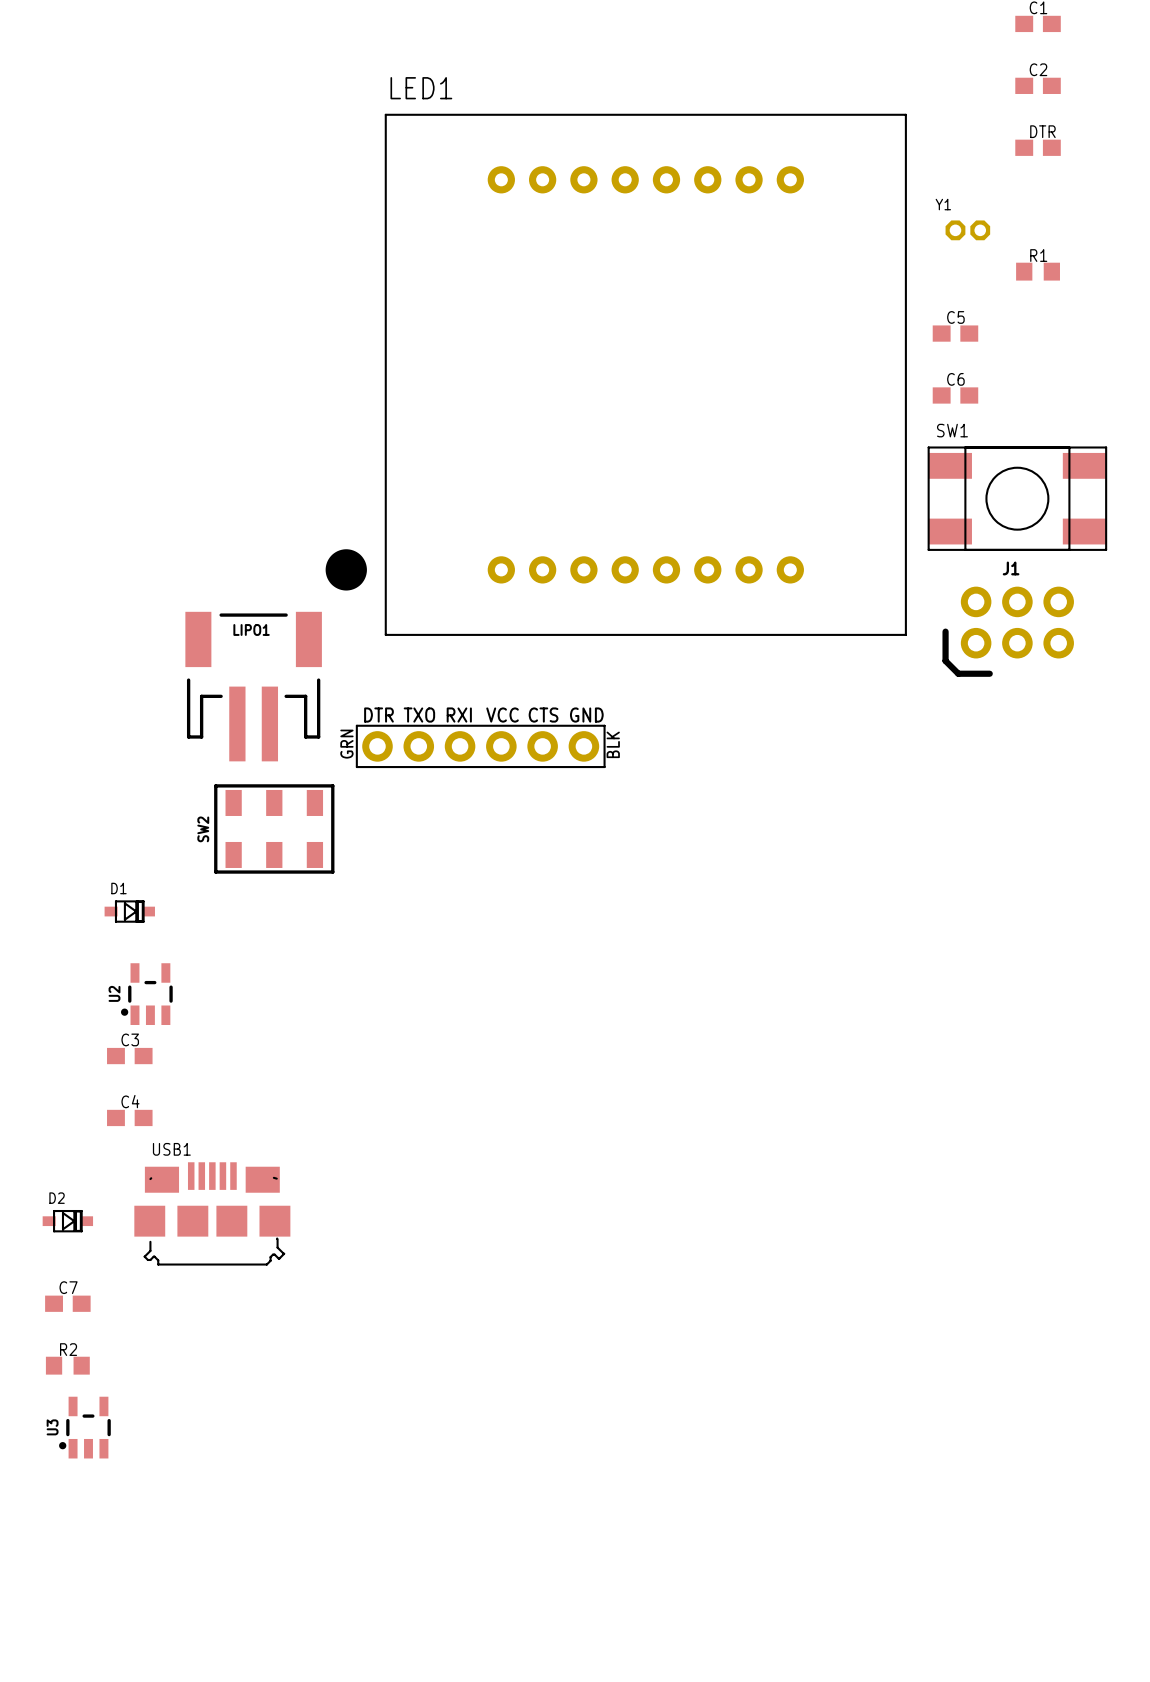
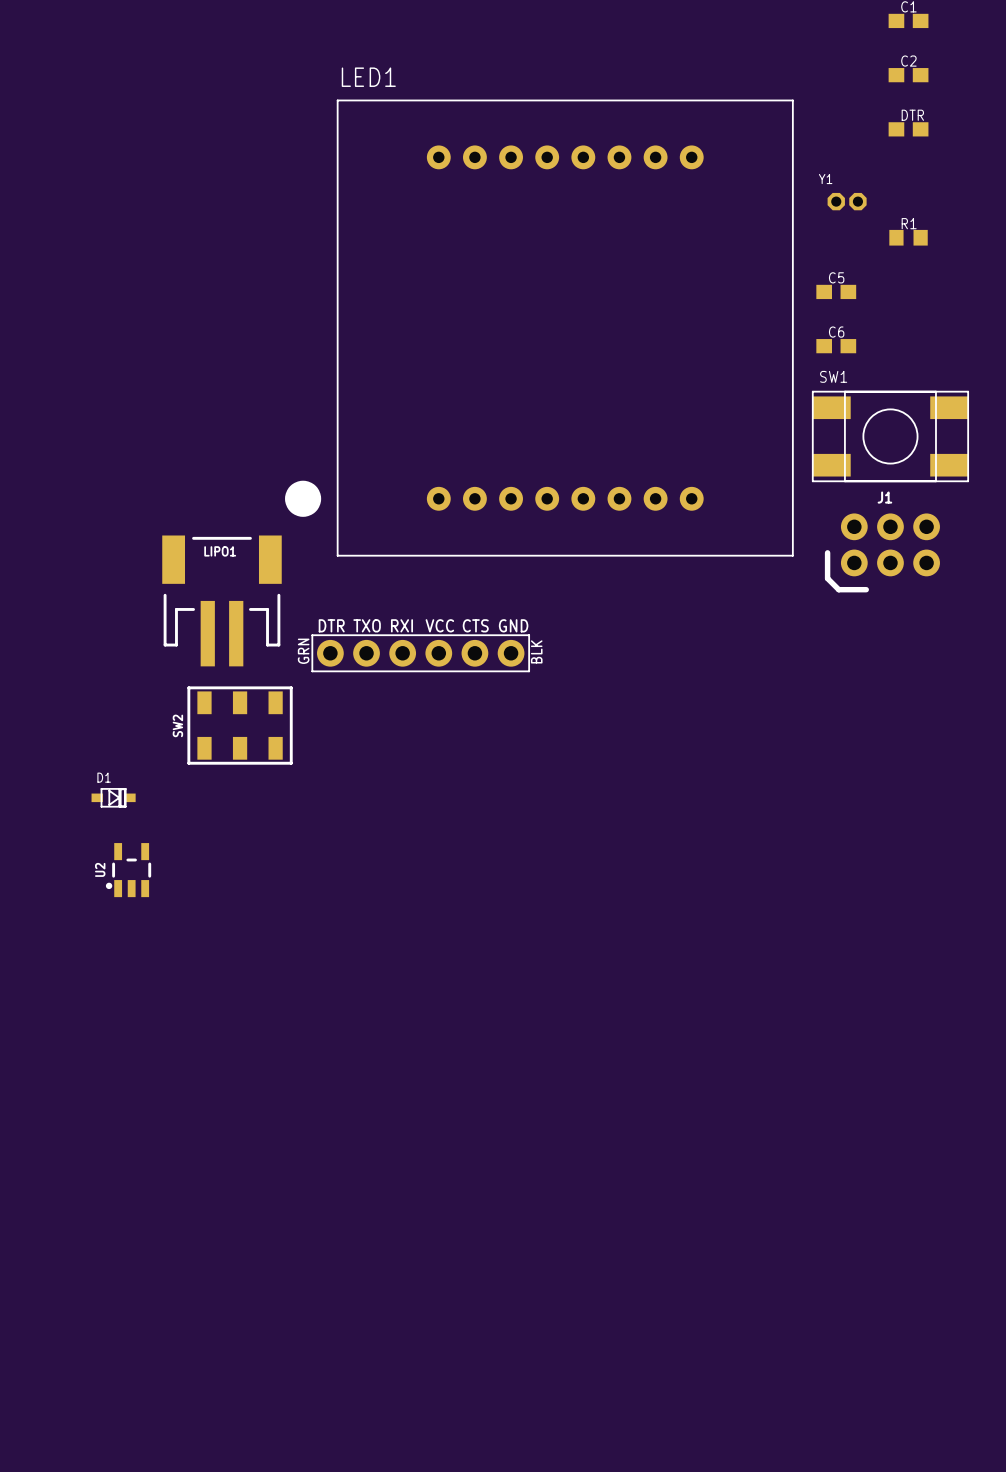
C3: (129, 1056) -> none
C4: (129, 1117) -> none
USB1: (212, 1213) -> none
D2: (67, 1221) -> none
C7: (67, 1303) -> none
R2: (67, 1365) -> none
U3: (84, 1427) -> none

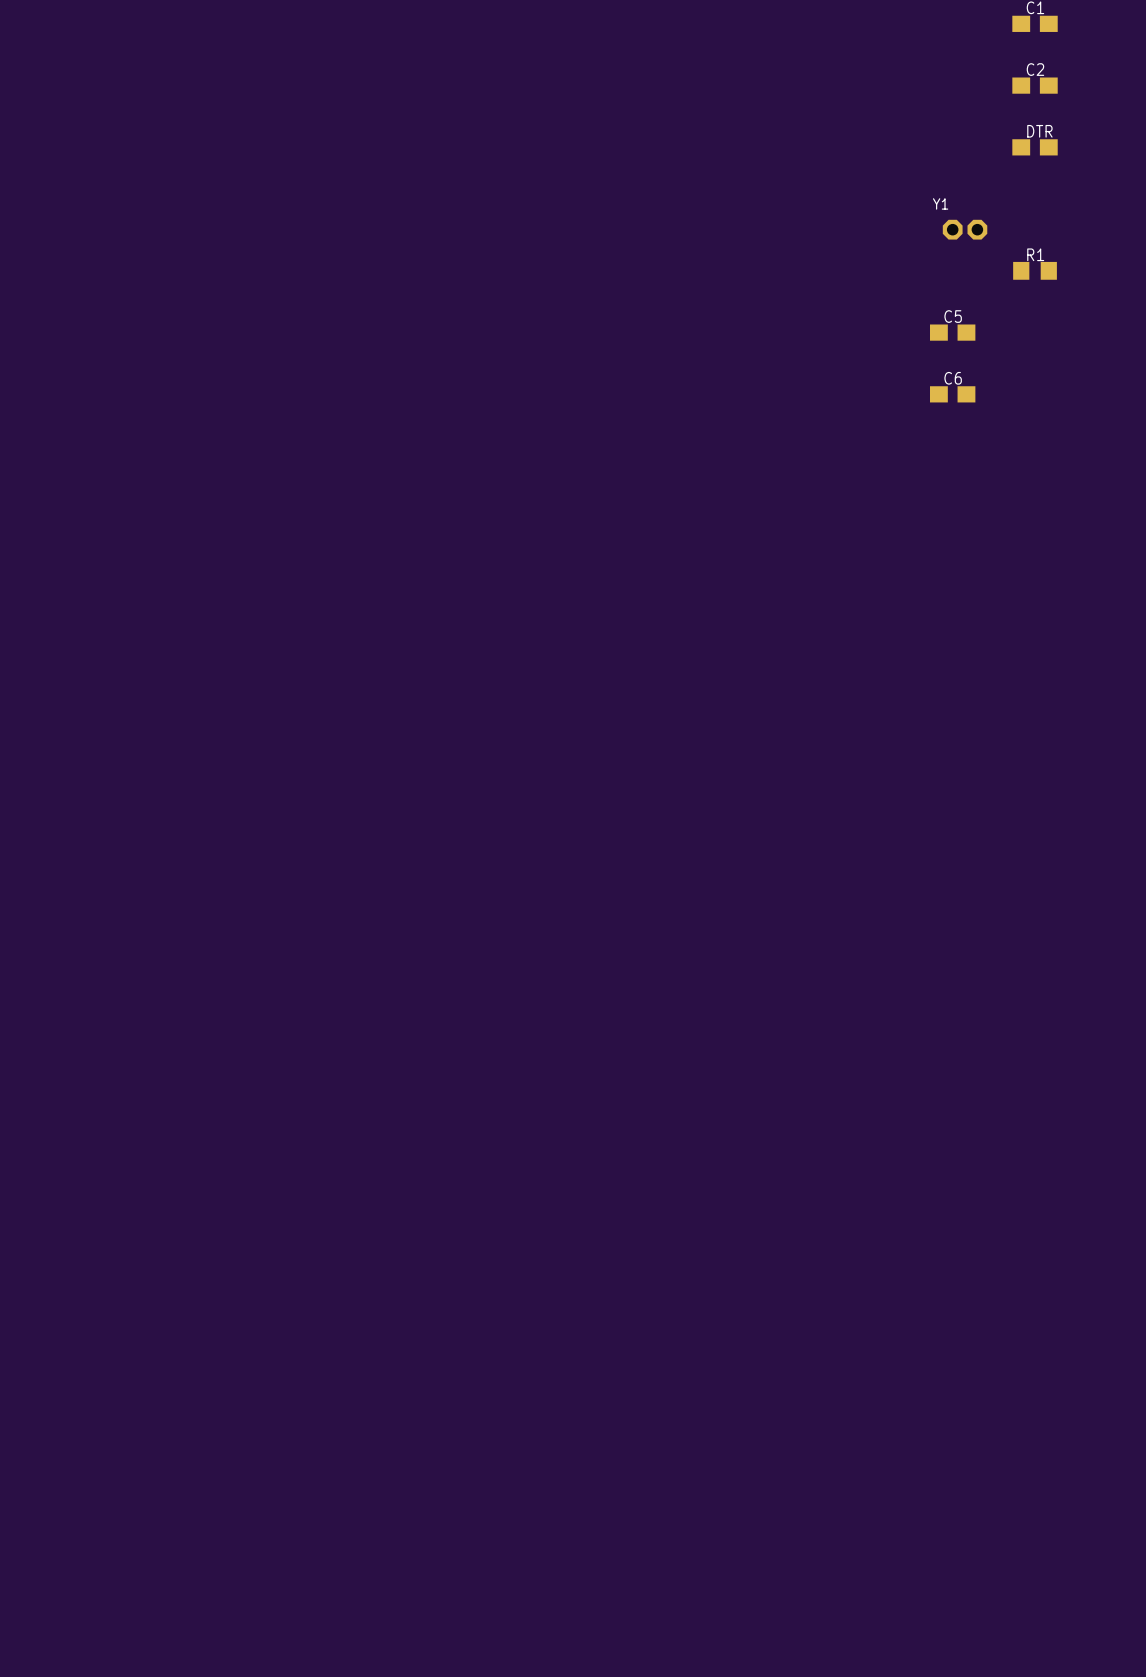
LED1: (539, 328) -> none
SW1: (890, 436) -> none
J1: (882, 552) -> none
LIPO1: (221, 600) -> none
part: (420, 653) -> none
SW2: (240, 725) -> none
D1: (113, 797) -> none
U2: (128, 870) -> none

